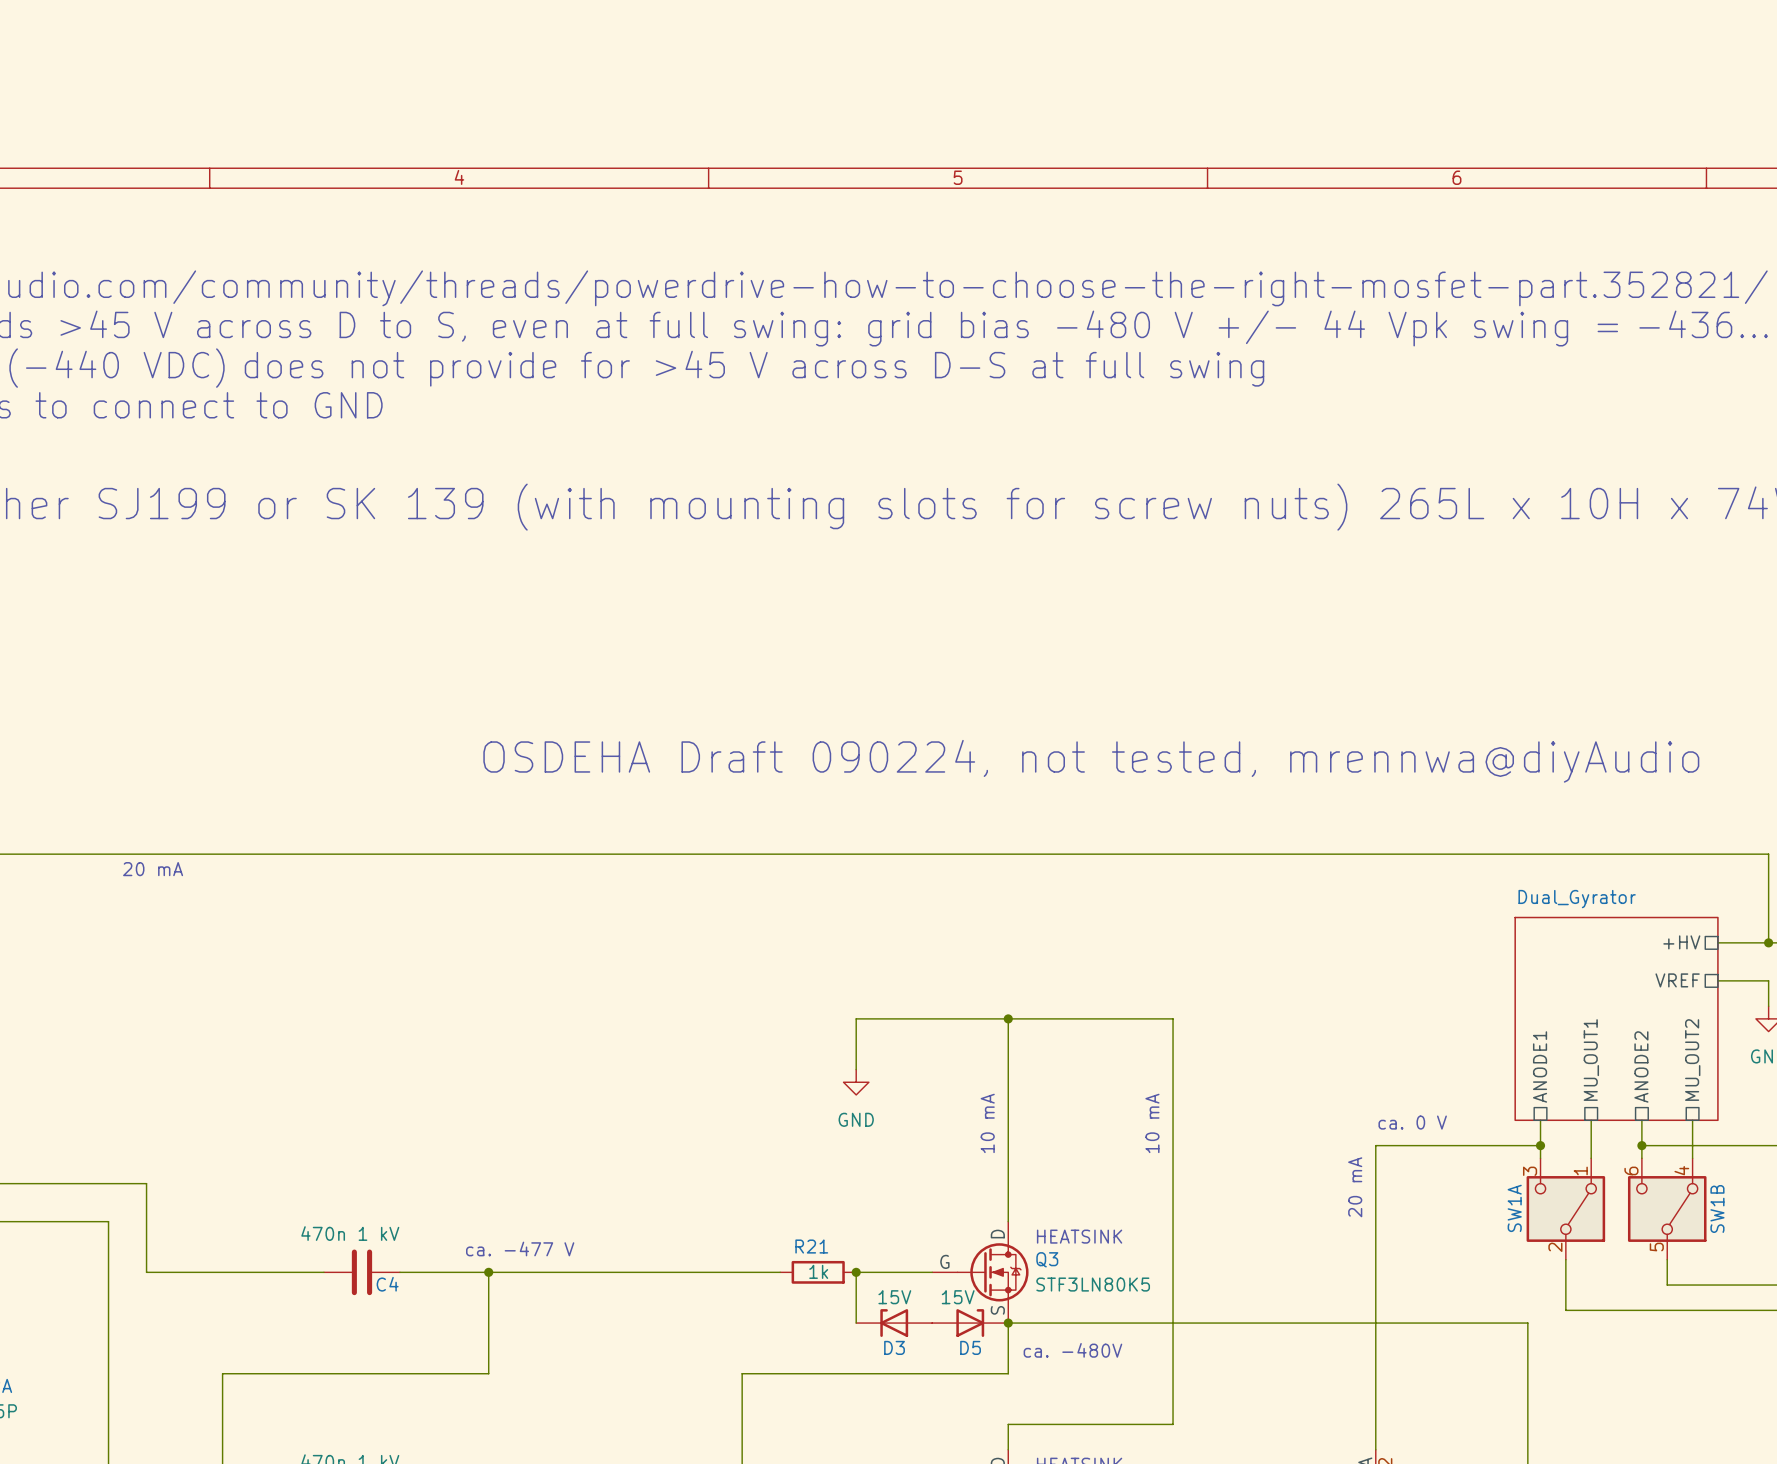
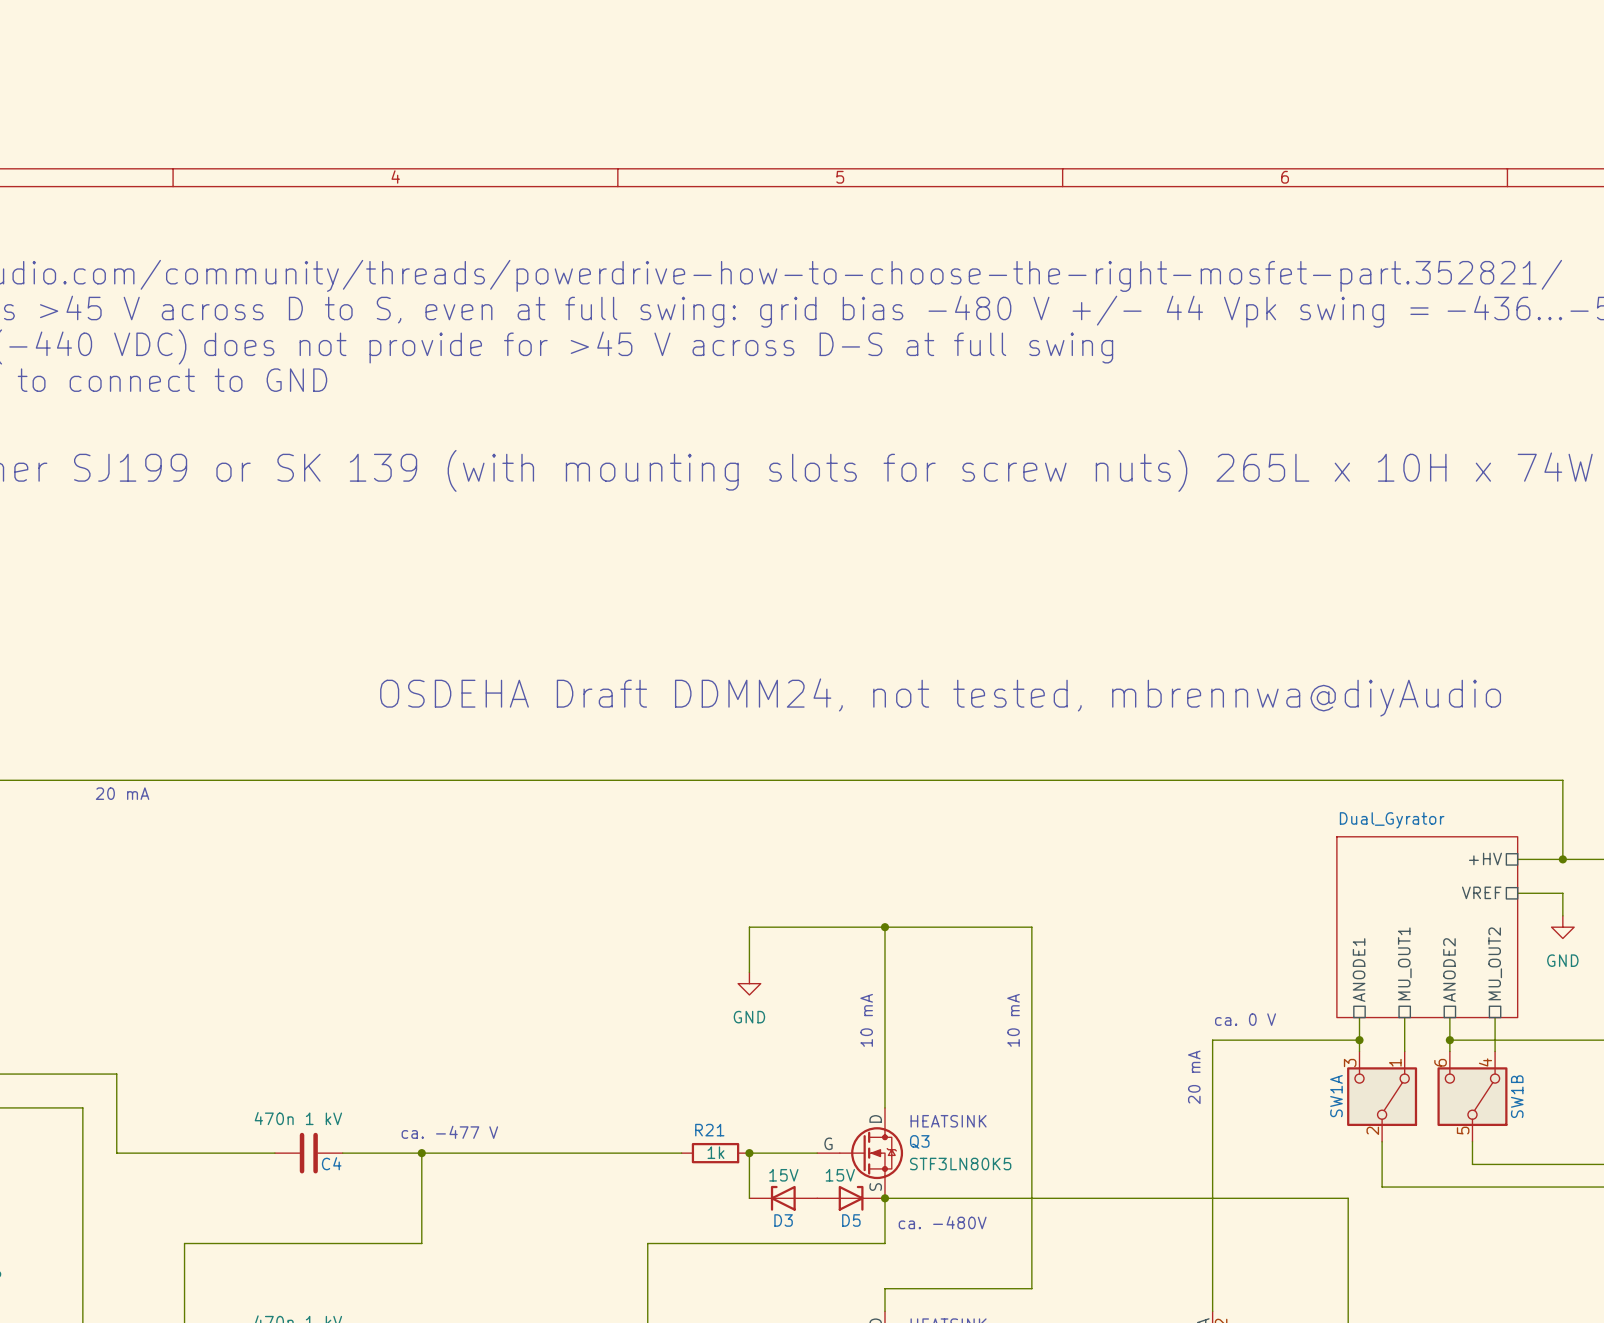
text: OSDEHA Draft 090224, not tested, mrennwa@diyAudio (1091, 761) -> OSDEHA Draft DDMM24, not tested, mbrennwa@diyAudio (940, 697)

